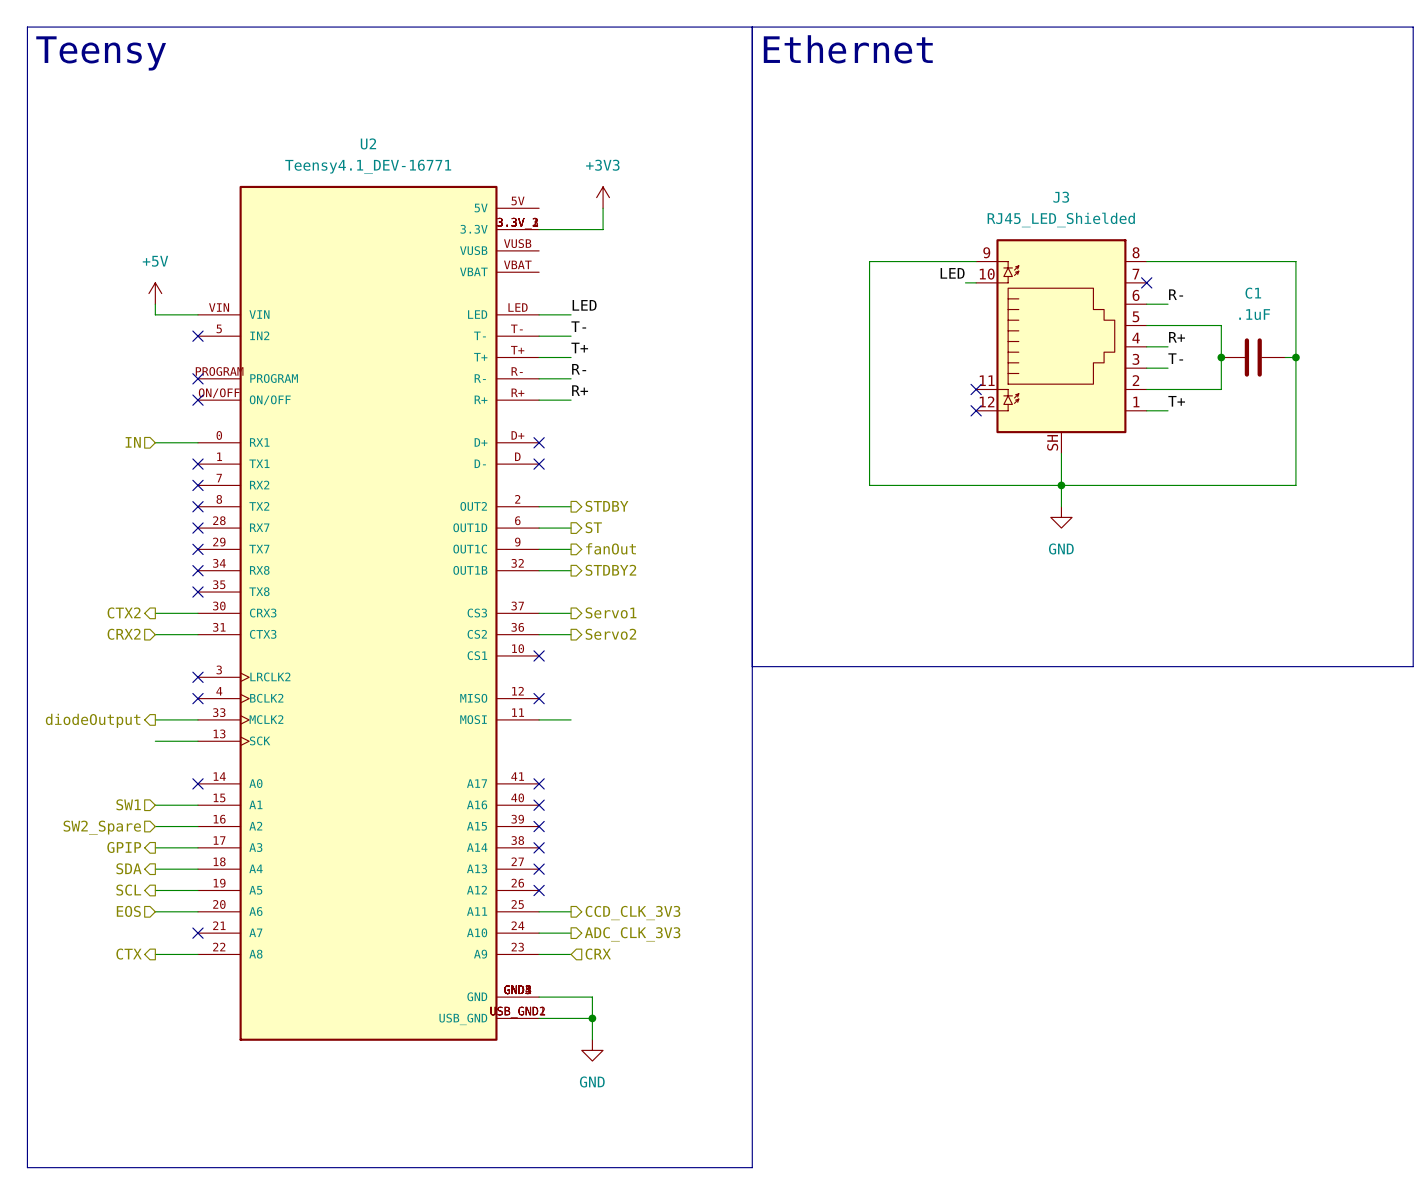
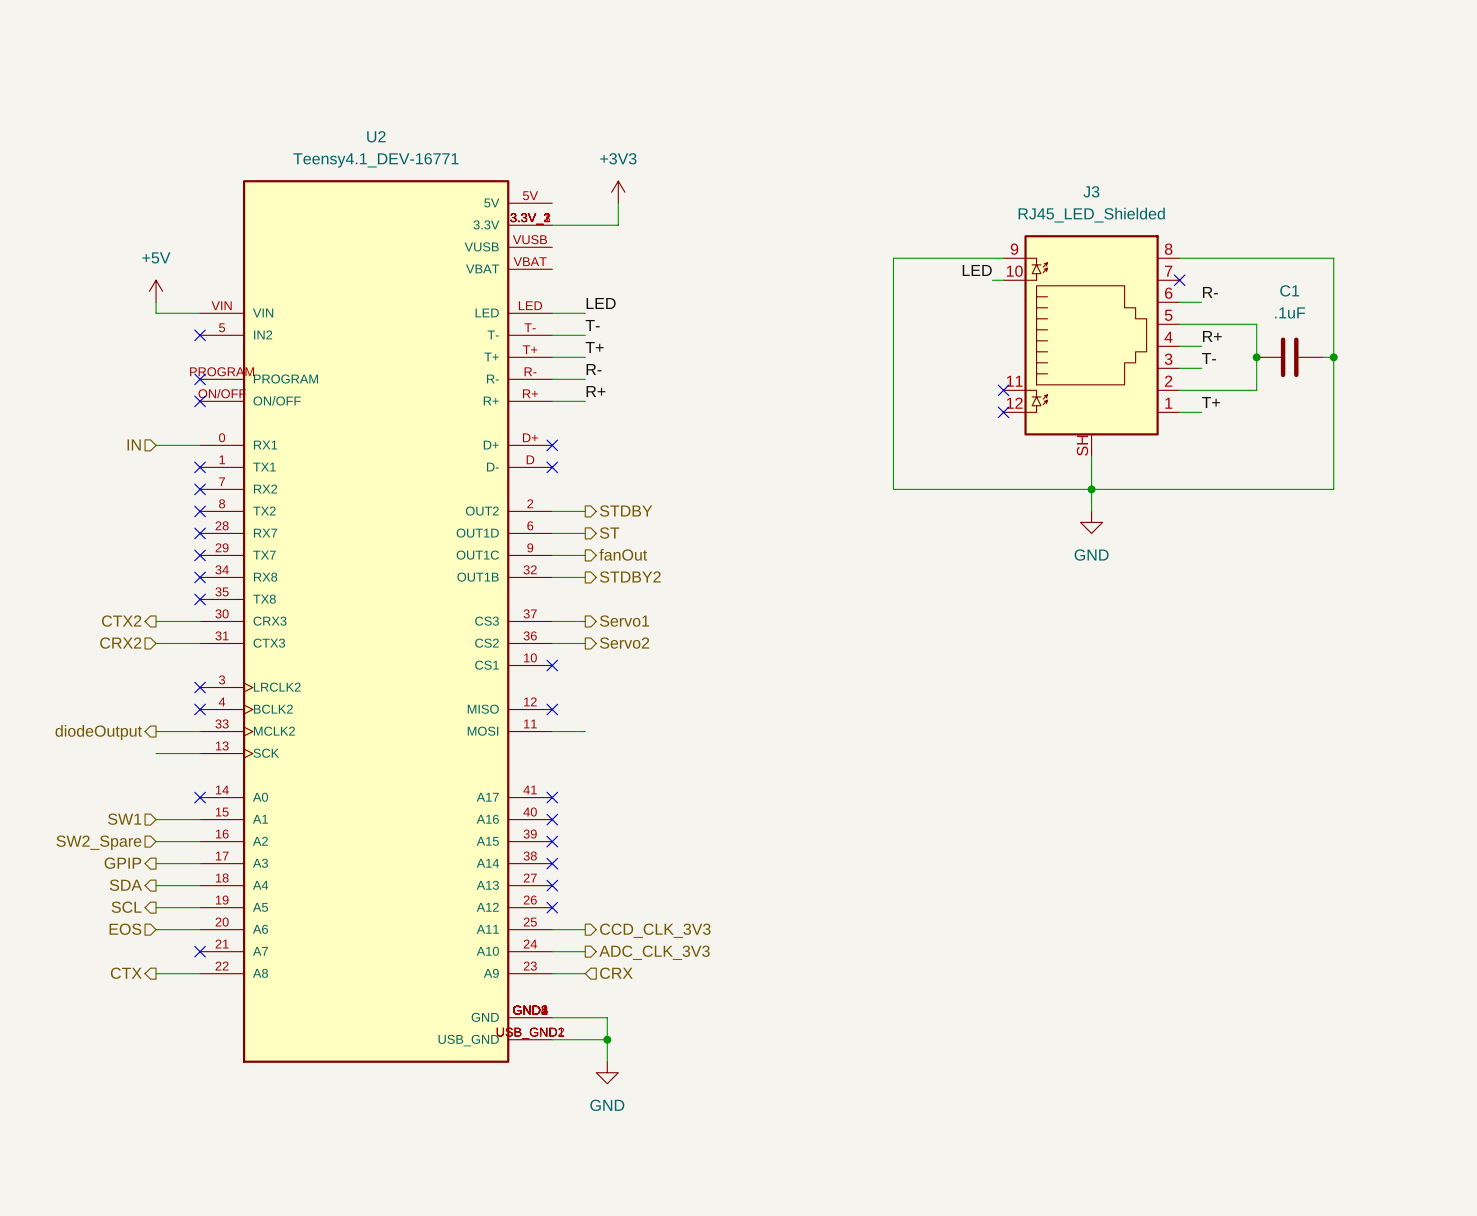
line: (752, 27) (752, 1167) (27, 1167) (27, 27) (1413, 27) (1413, 666) (752, 666) -> none
text: Ethernet (848, 49) -> none
text: Teensy (101, 53) -> none

